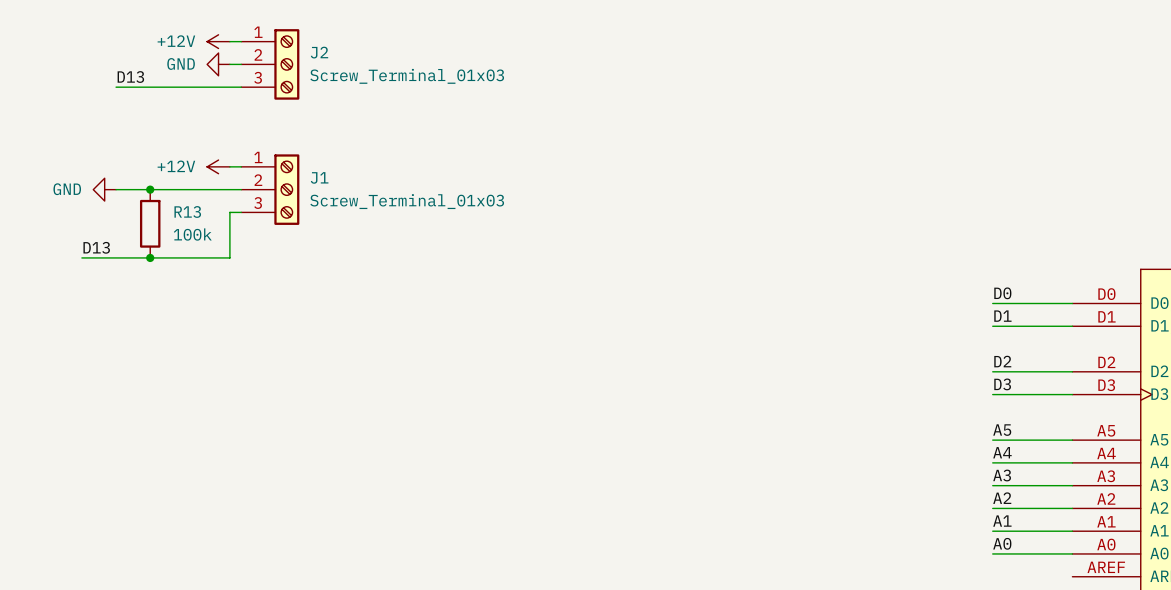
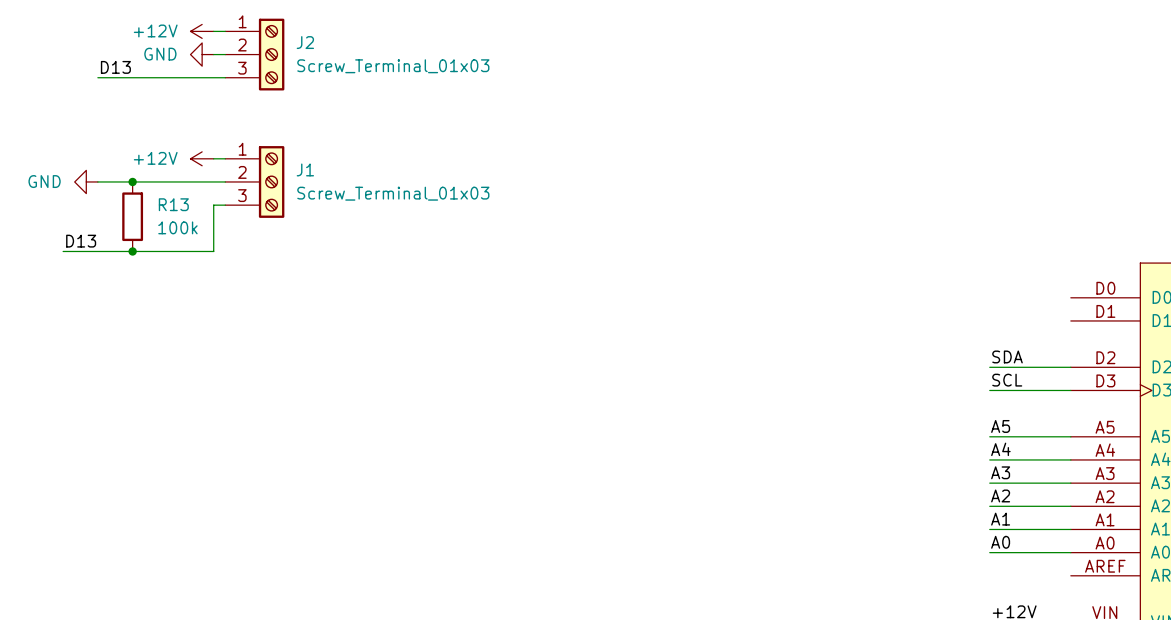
label: D0 (1002, 293) -> none
wire: (992, 303) (1072, 303) -> none
label: D1 (1002, 316) -> none
wire: (992, 326) (1072, 326) -> none
label: D2 (1002, 361) -> SDA (1007, 356)
label: D3 (1002, 384) -> SCL (1007, 380)

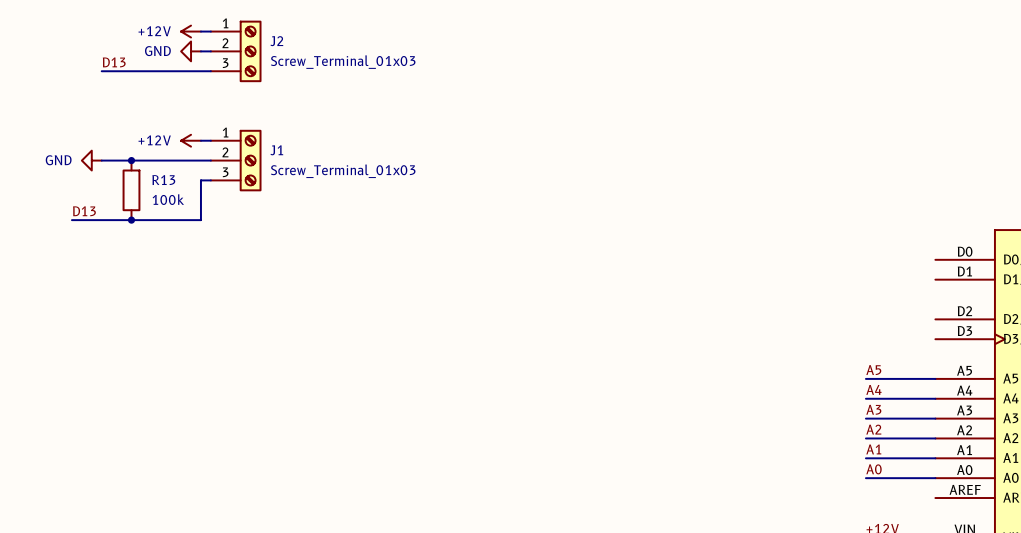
label: SDA (1007, 356) -> none
wire: (989, 367) (1070, 367) -> none
label: SCL (1007, 380) -> none
wire: (989, 390) (1070, 390) -> none

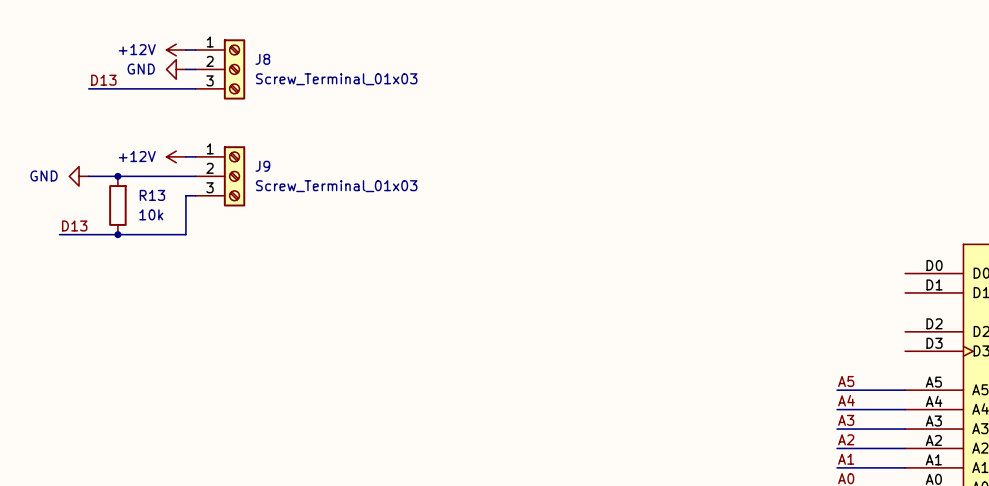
J2 name: J2 (276, 41) -> J8 (262, 59)
J1 name: J1 (276, 150) -> J9 (262, 166)
R13 value: 100k (168, 199) -> 10k (151, 214)

